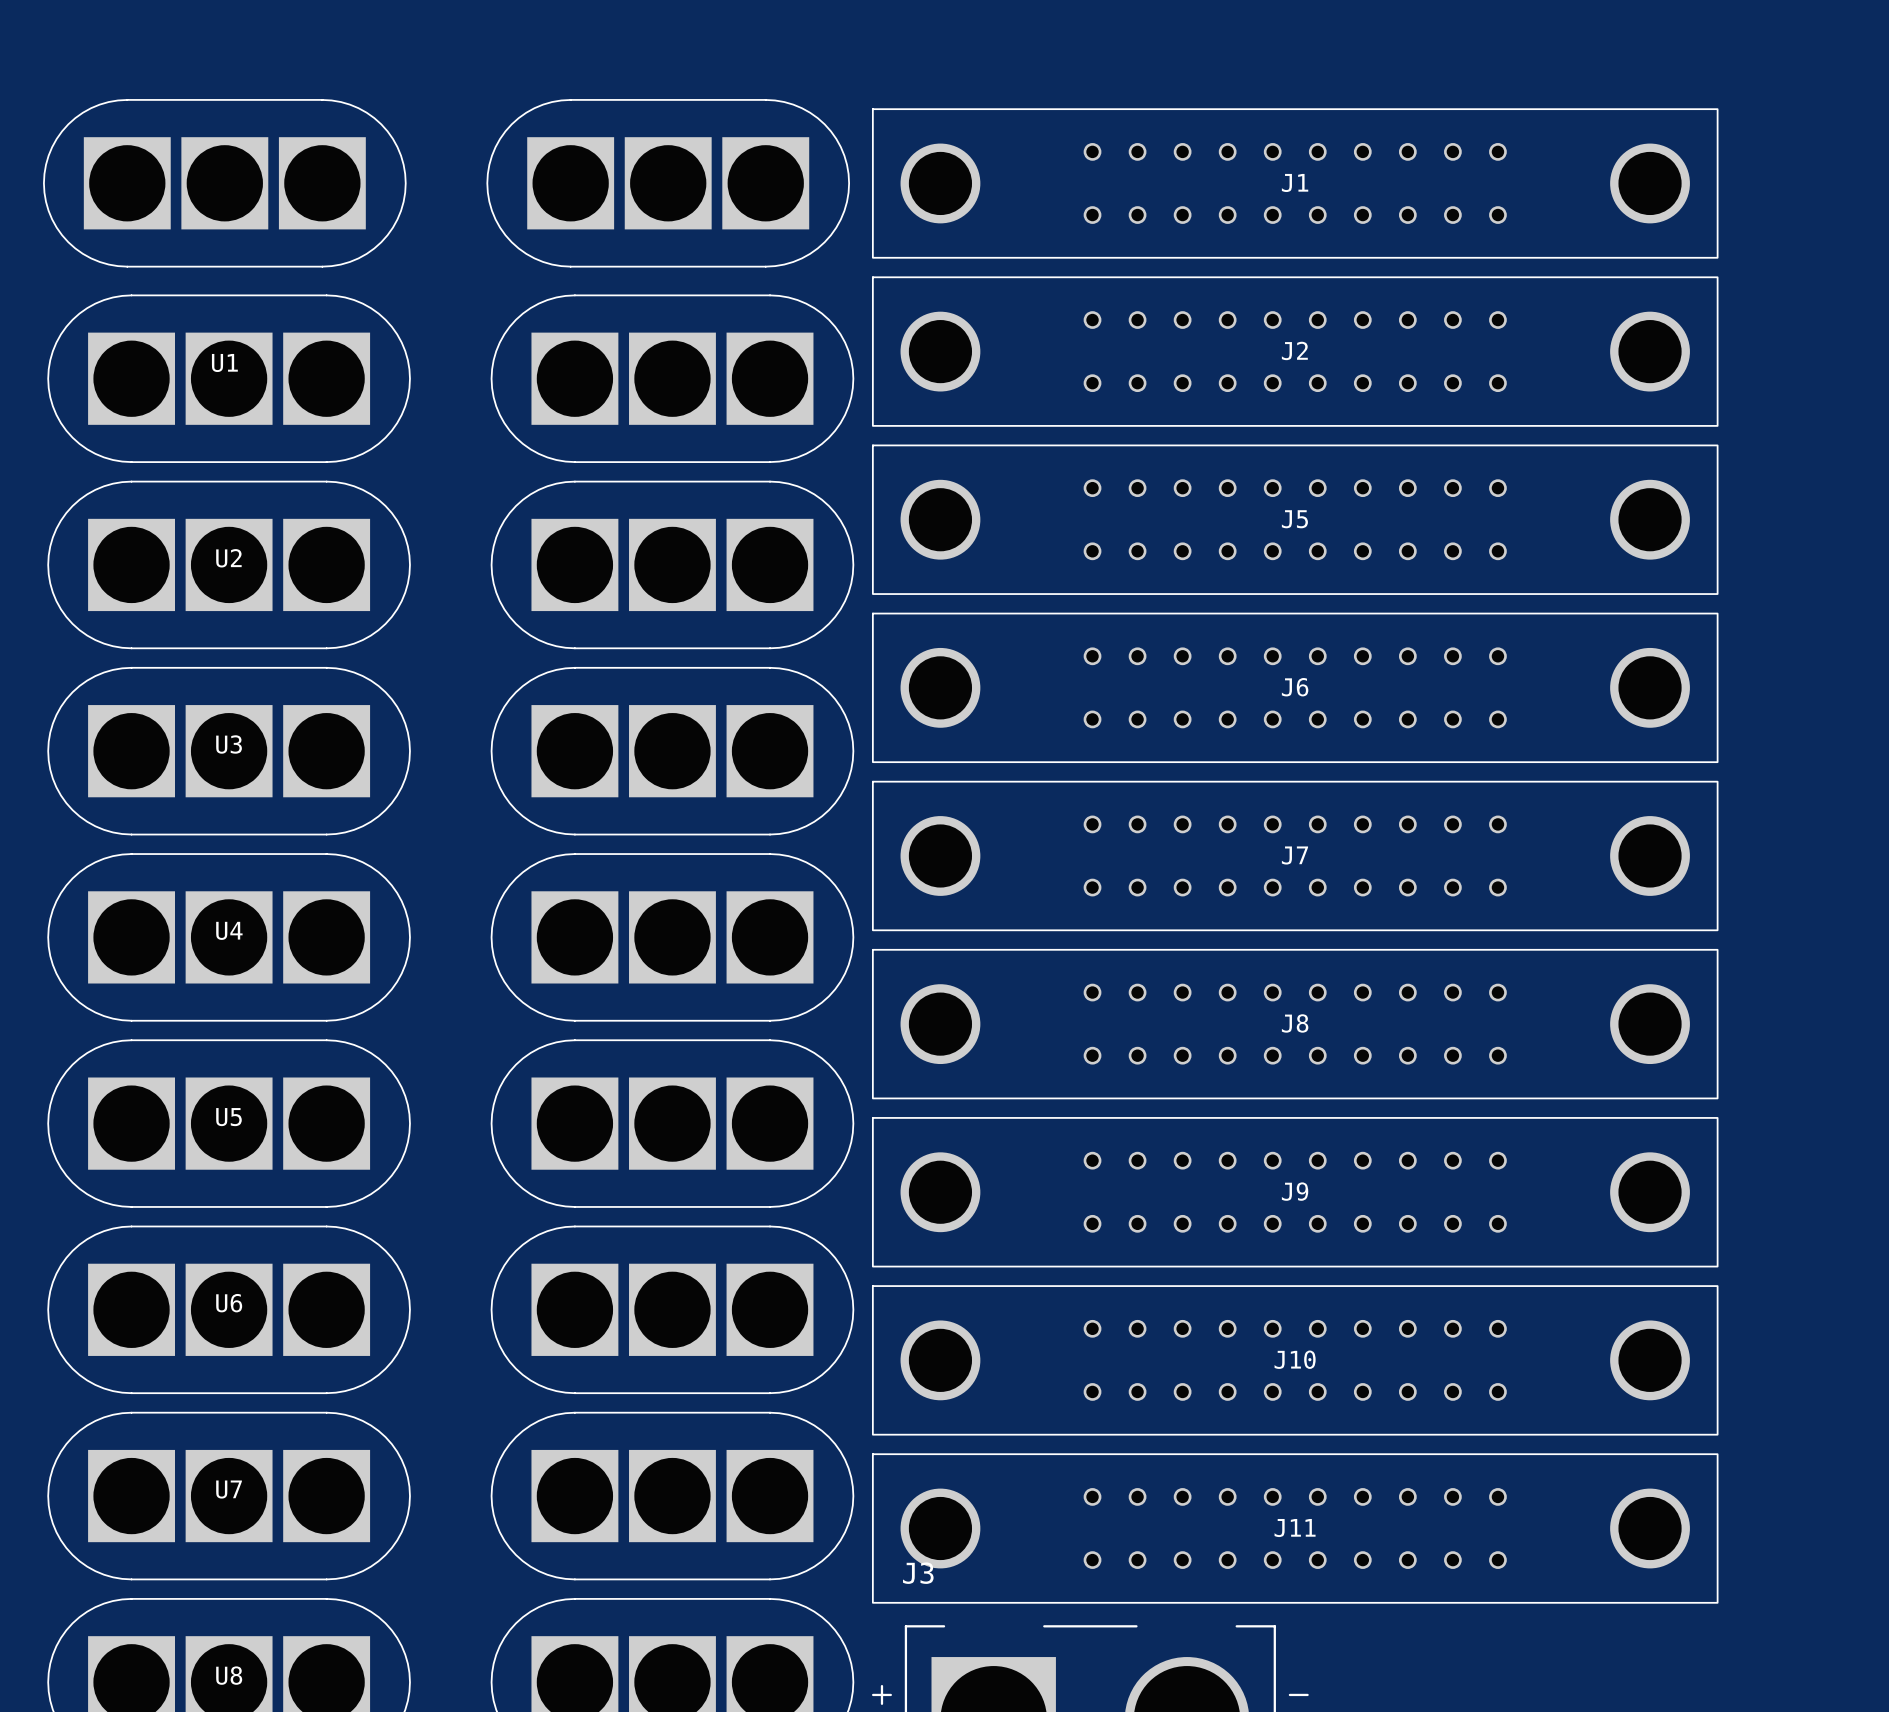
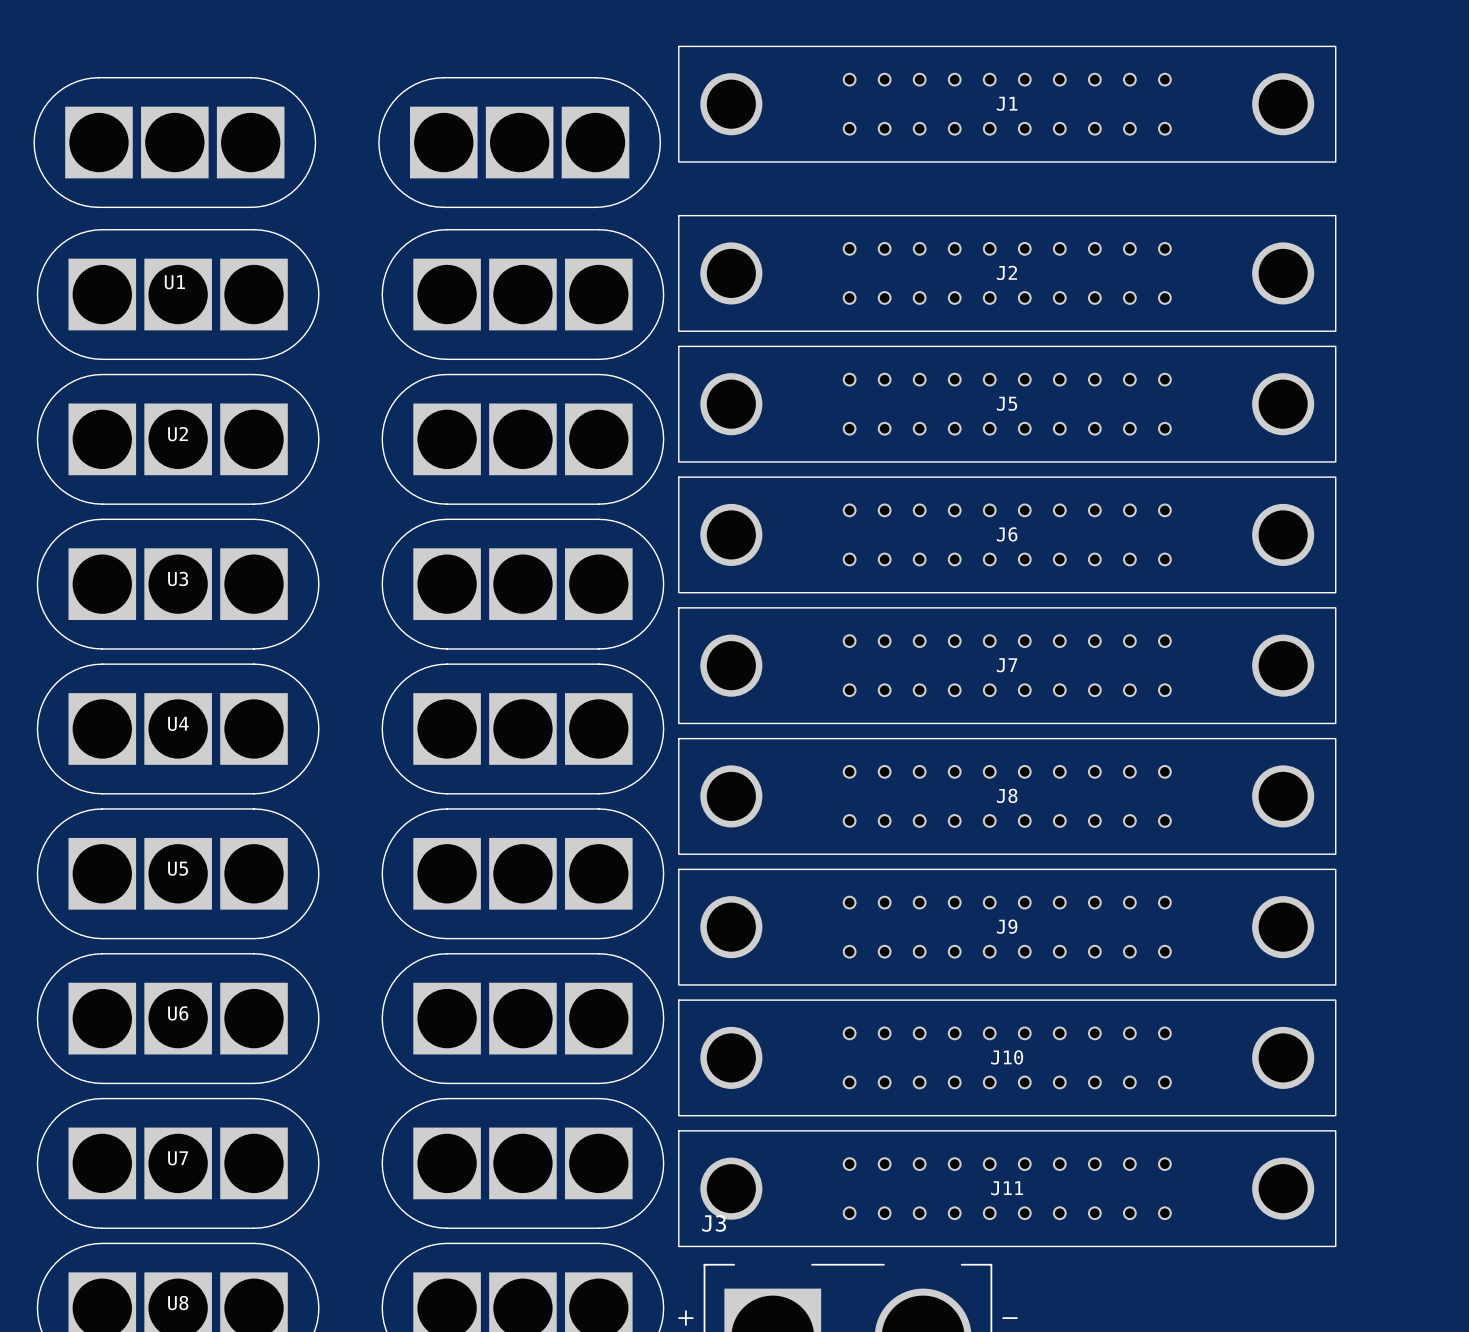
J1 position: (1295, 183) -> (1007, 104)

